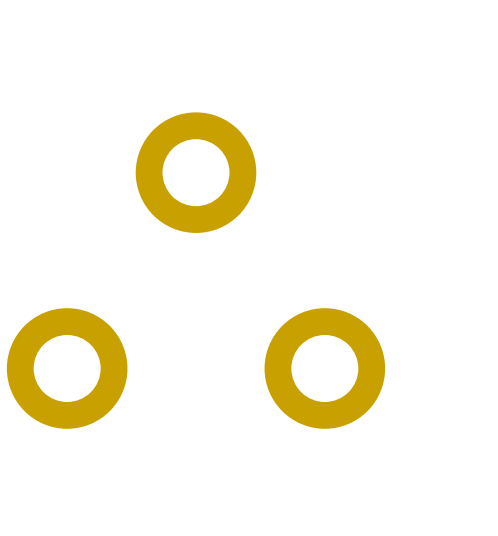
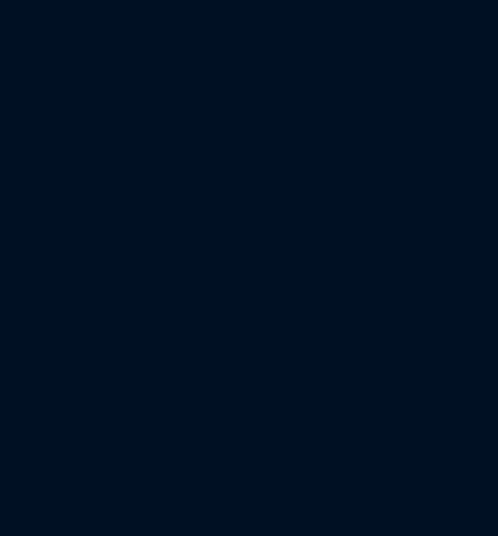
part: (196, 270) -> none

